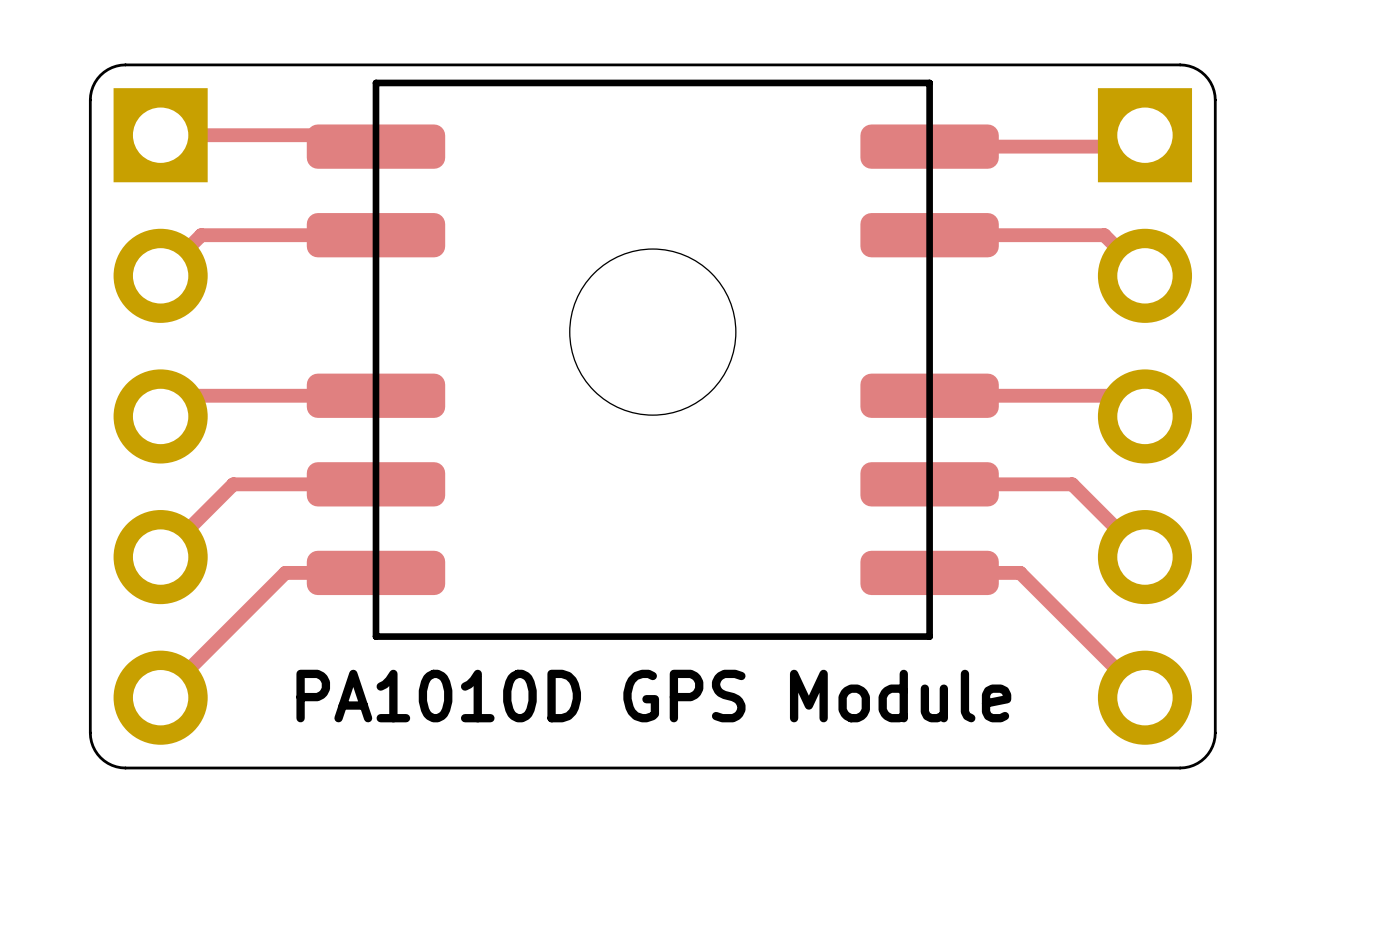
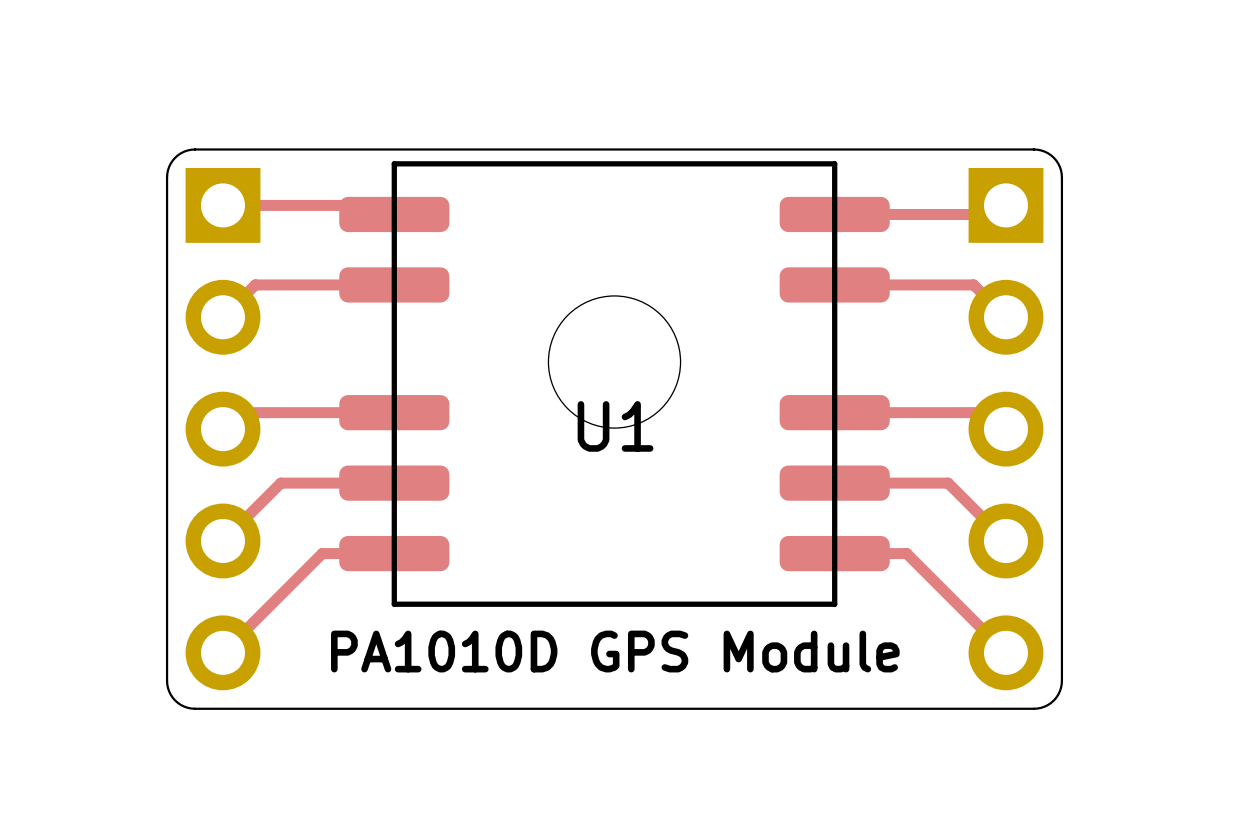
U1 name: none -> U1 (615, 426)

